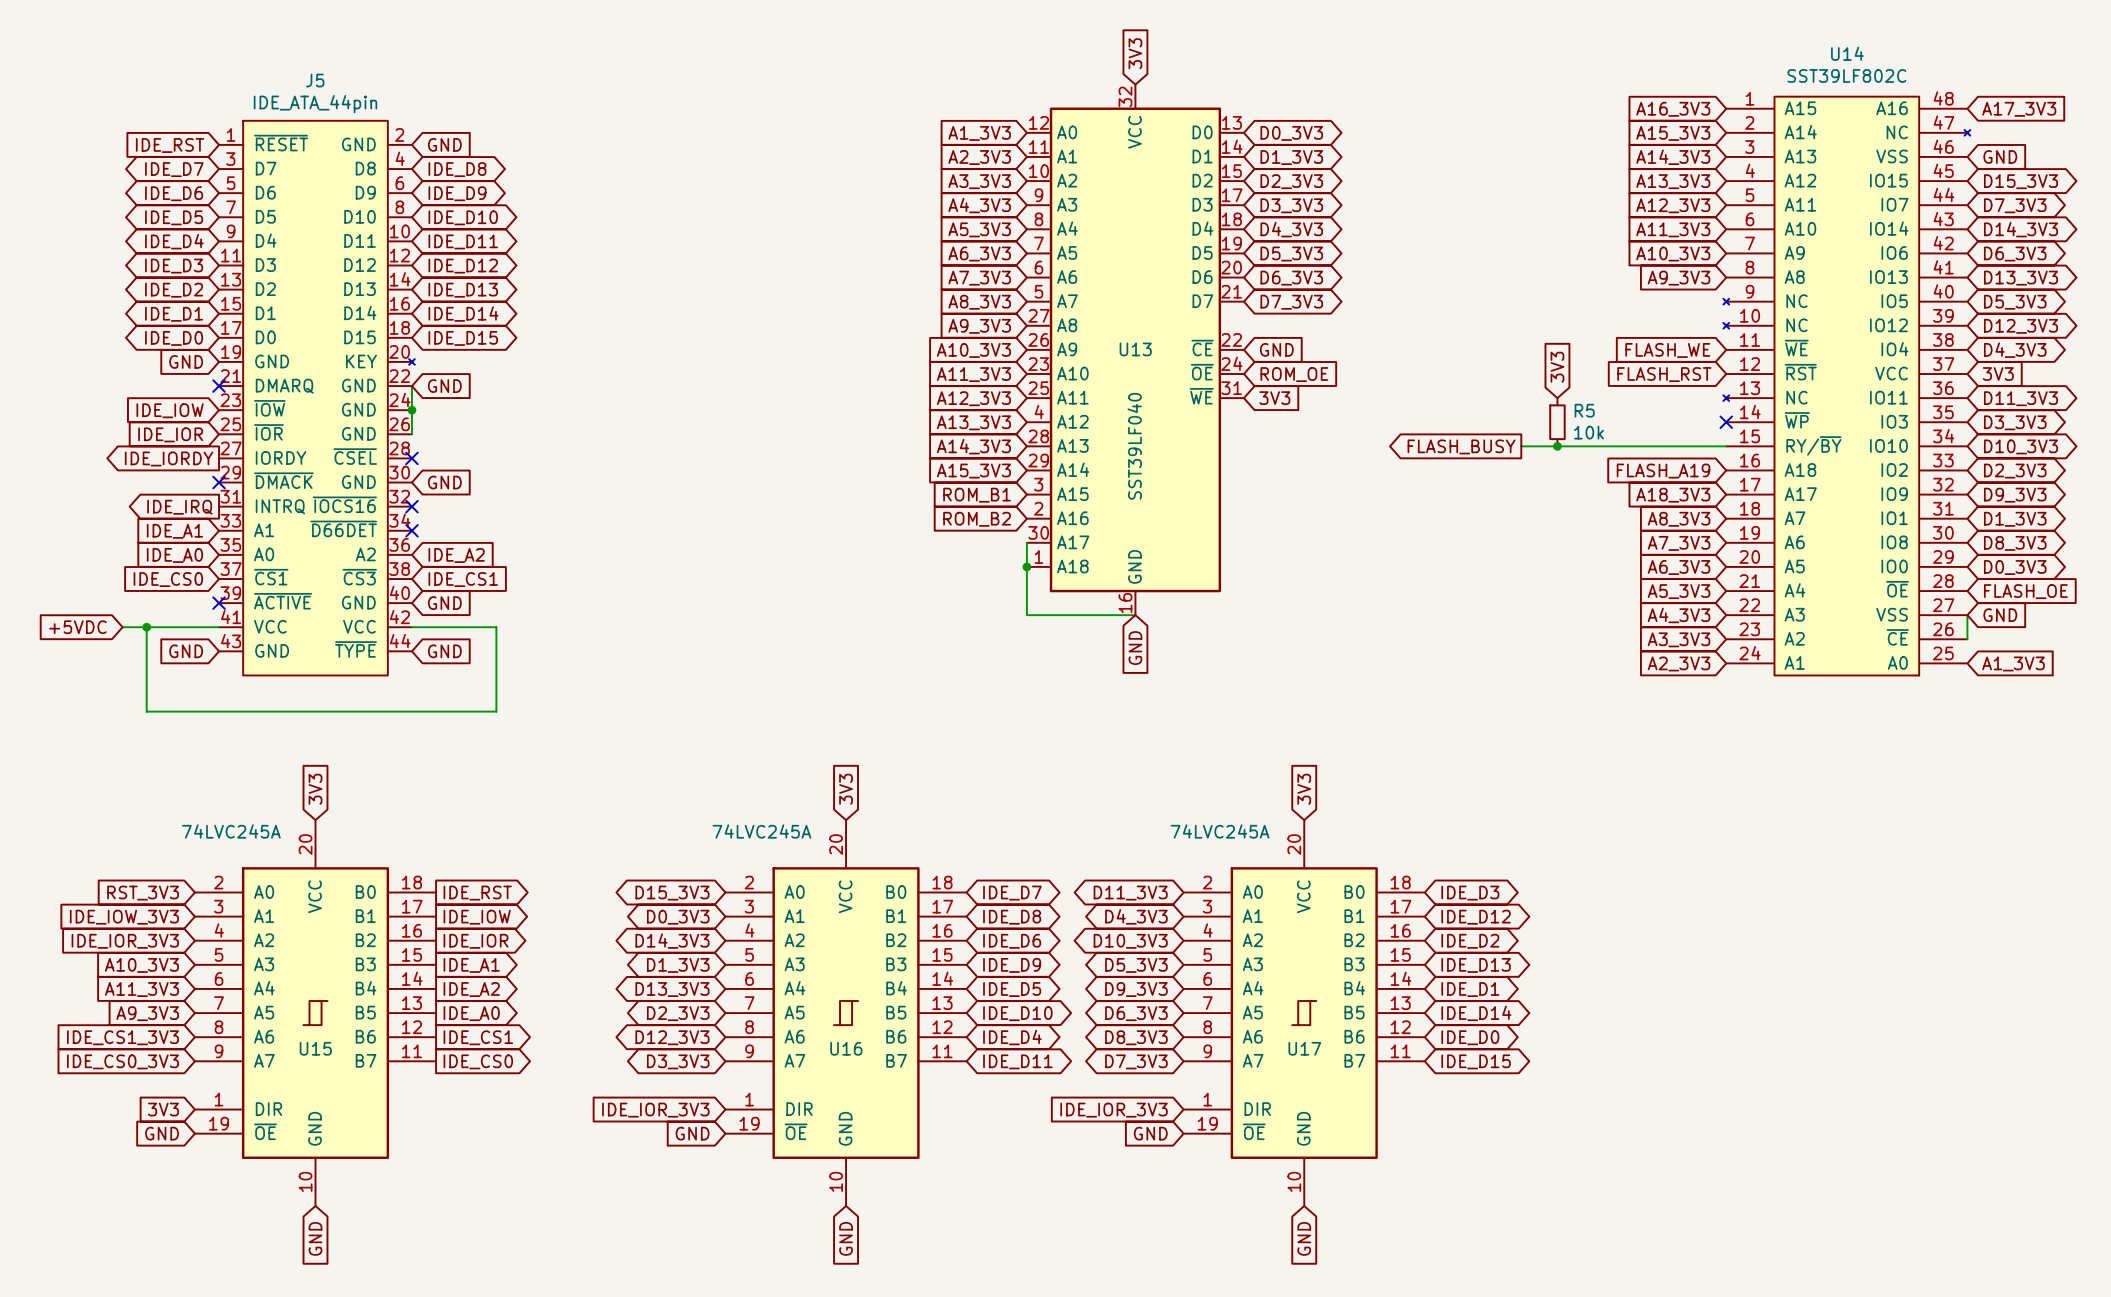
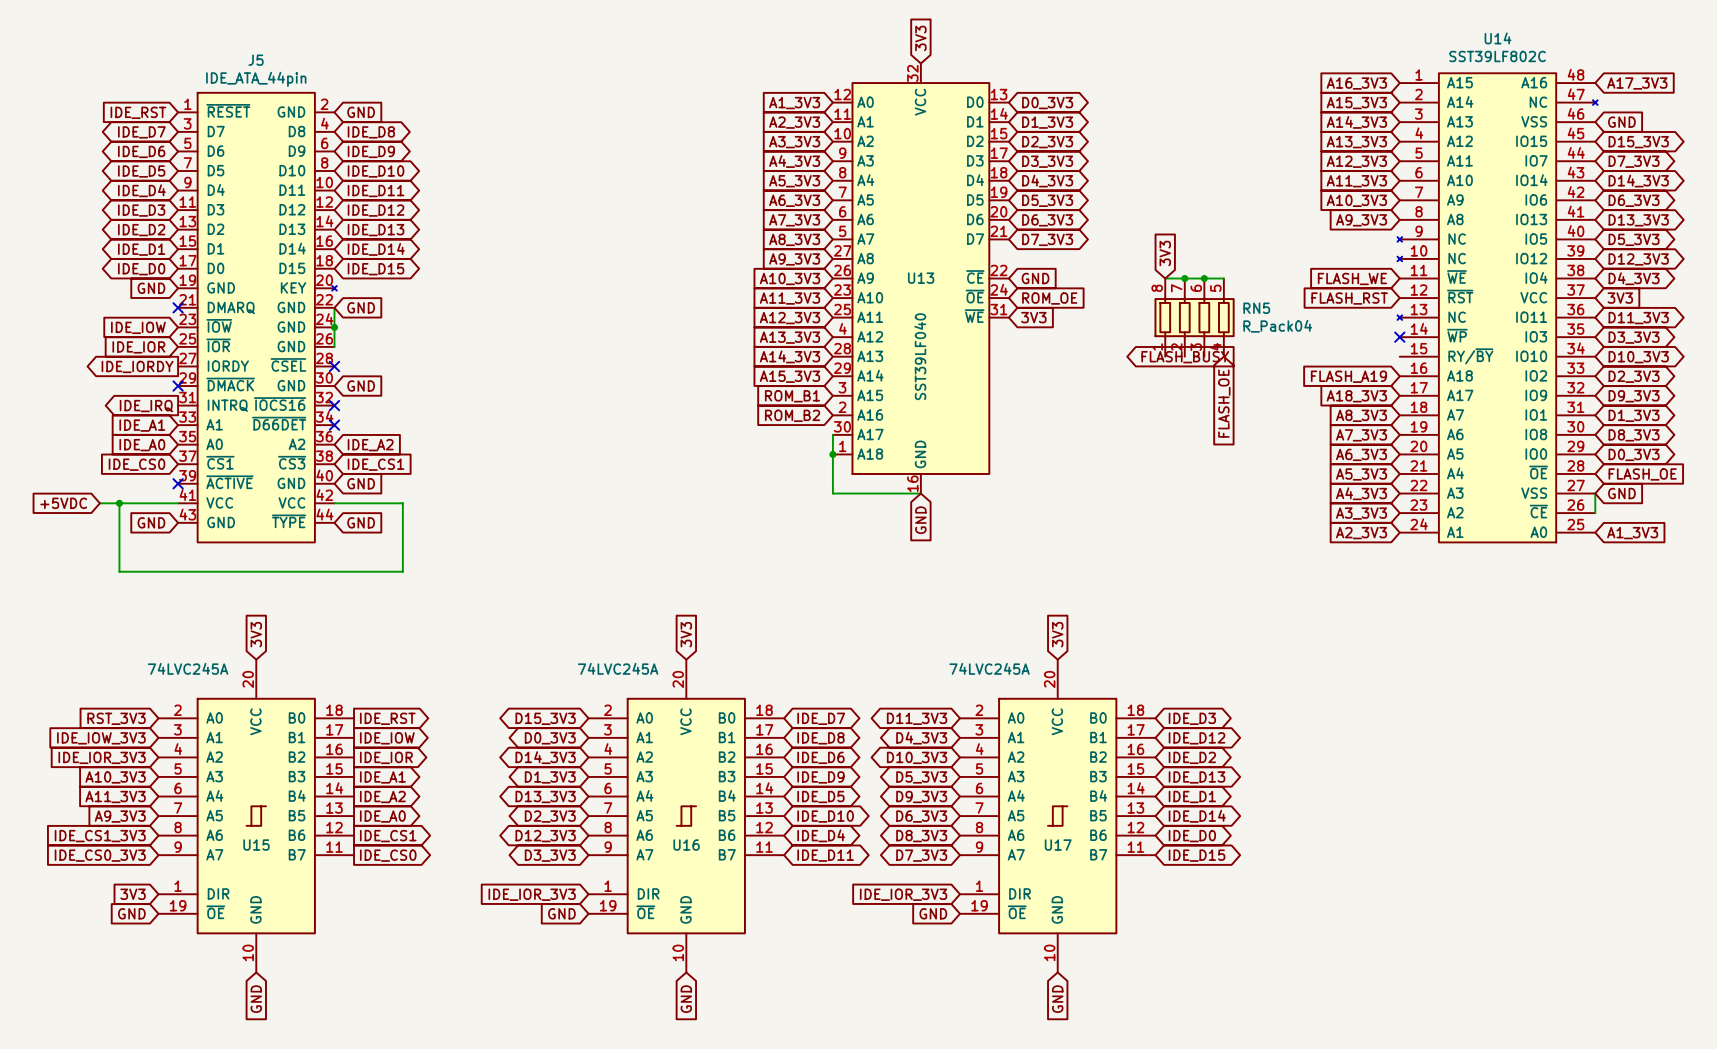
wire: none -> (1165, 278) (1223, 278)
junction: none -> (1184, 278)
junction: none -> (1204, 278)
global label position: 3V3 (1557, 367) -> 3V3 (1165, 253)
RN5: none -> R_Pack04 (1194, 317)
R5: 10k (1557, 422) -> none
wire: (1521, 446) (1726, 446) -> none
junction: (1557, 446) -> none
global label: none -> FLASH_OE (1224, 403)

